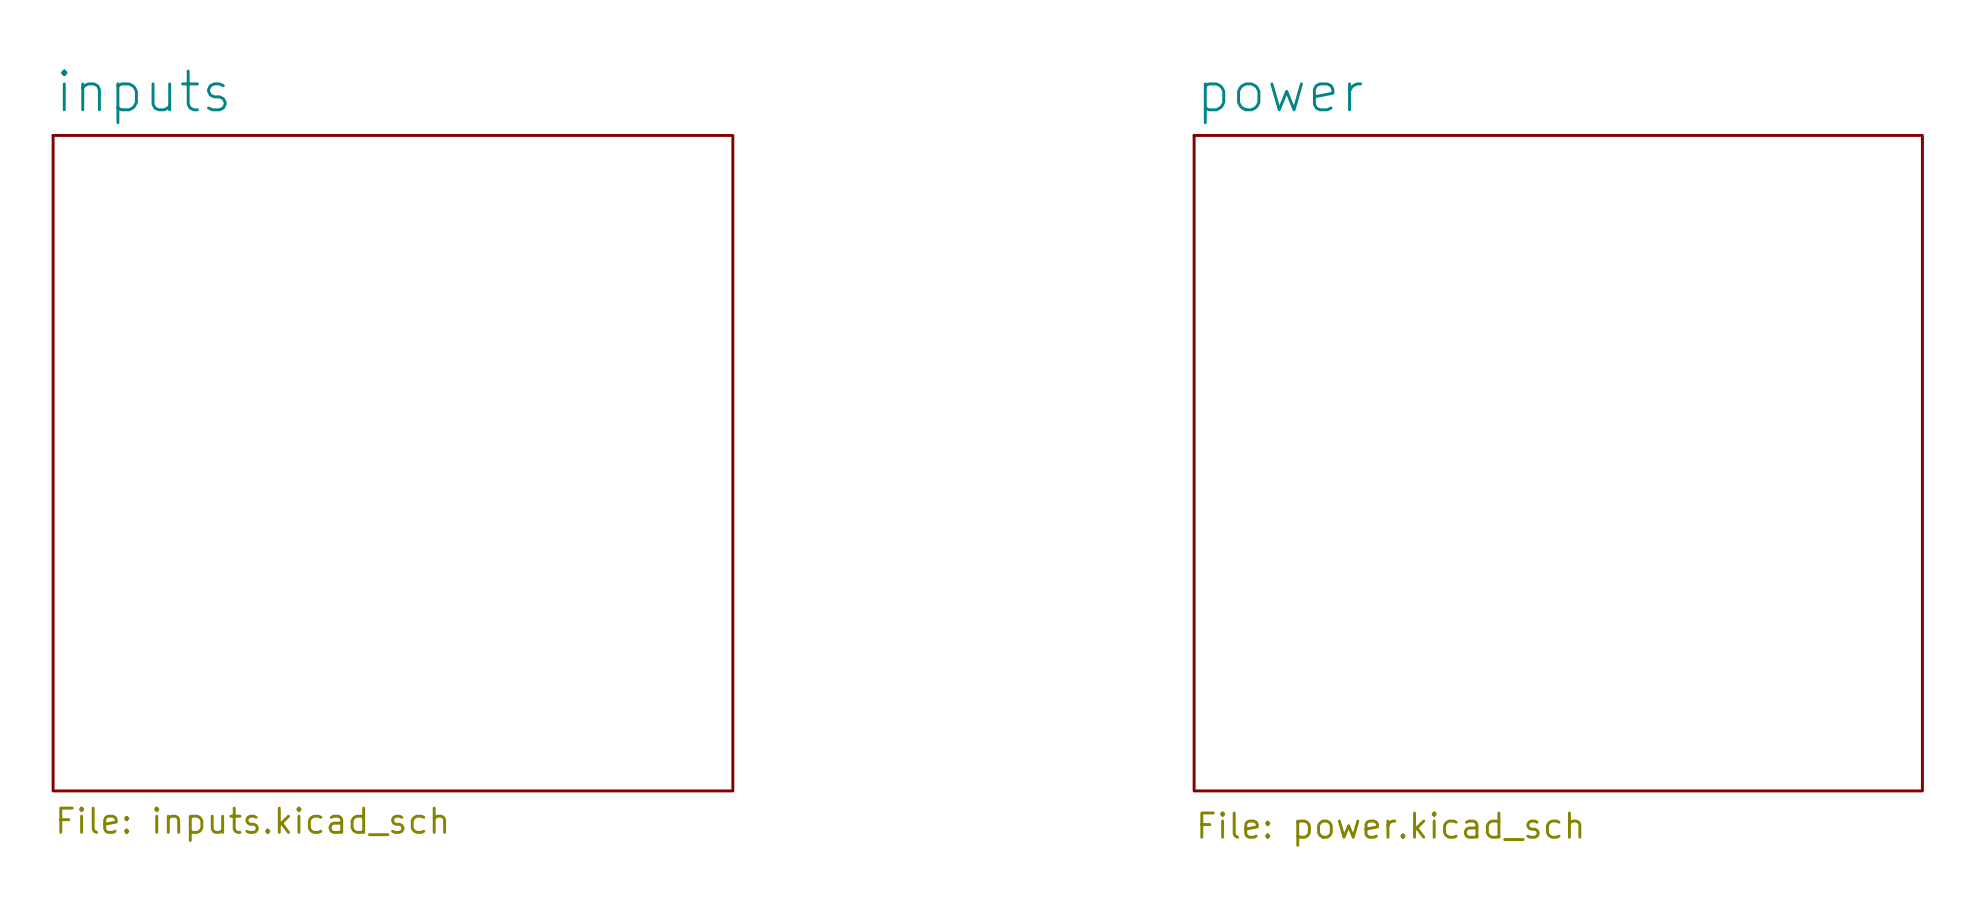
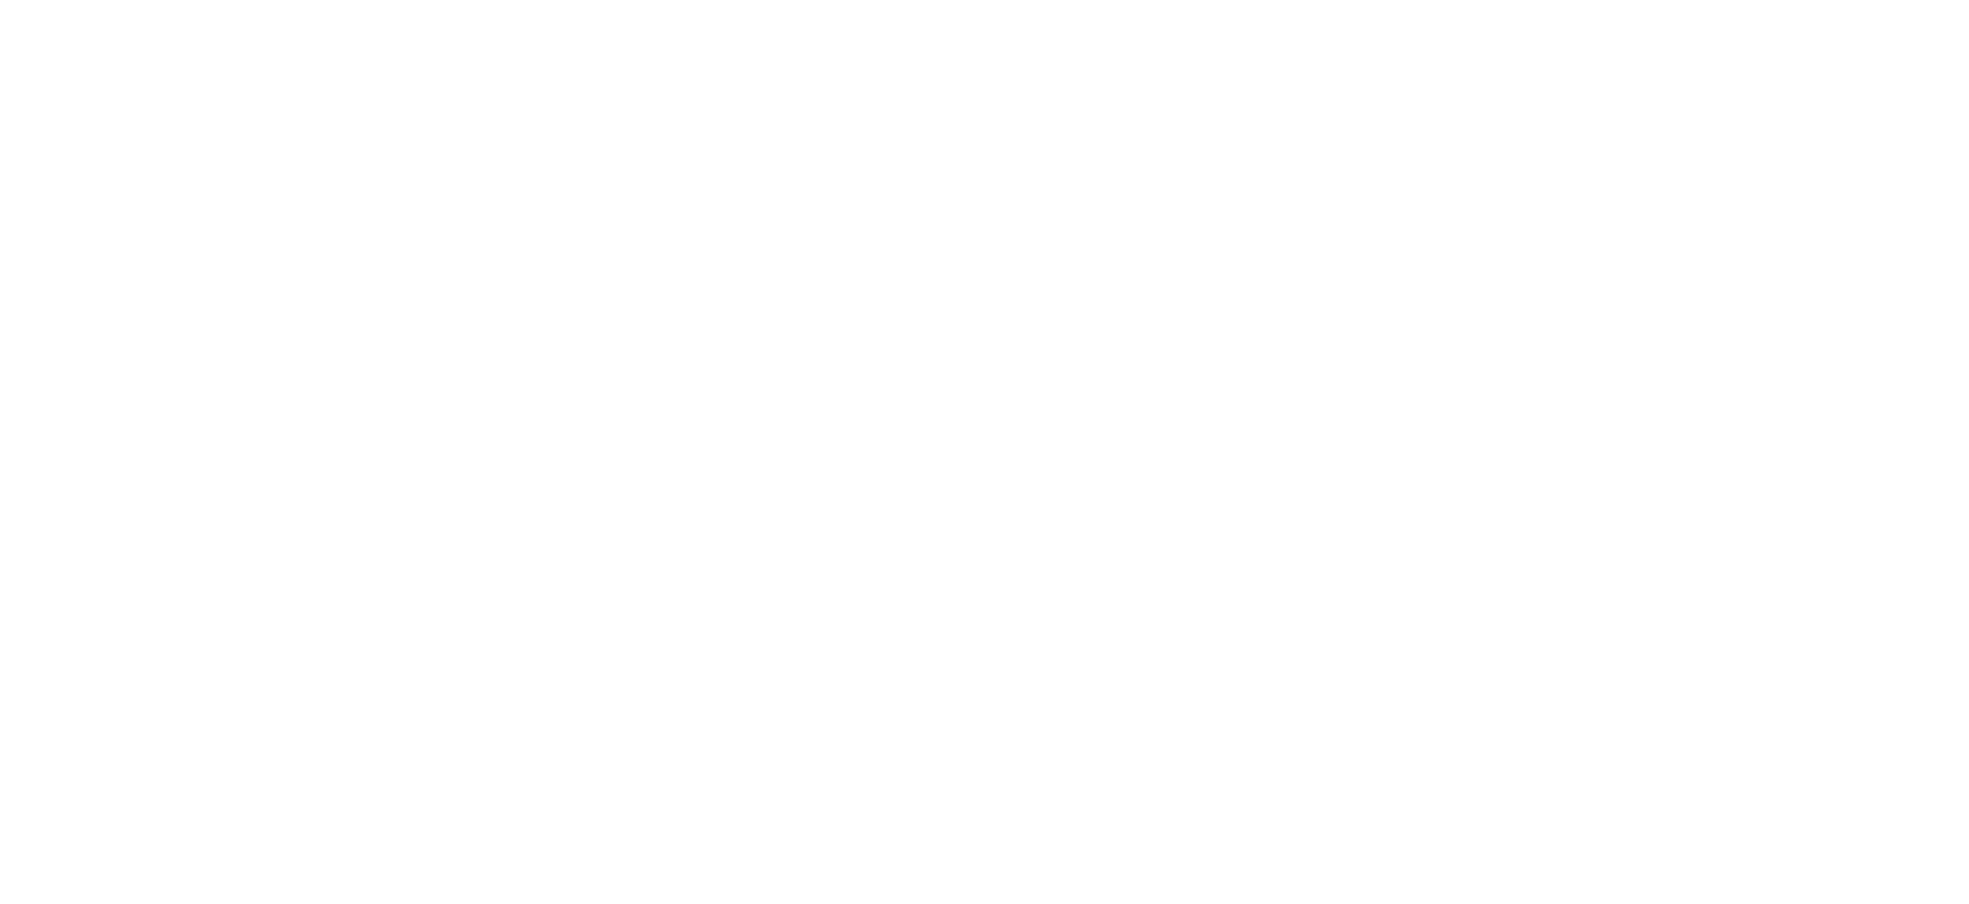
sheet inputs: File: inputs.kicad_sch (392, 463) -> none
sheet power: File: power.kicad_sch (1558, 463) -> none

